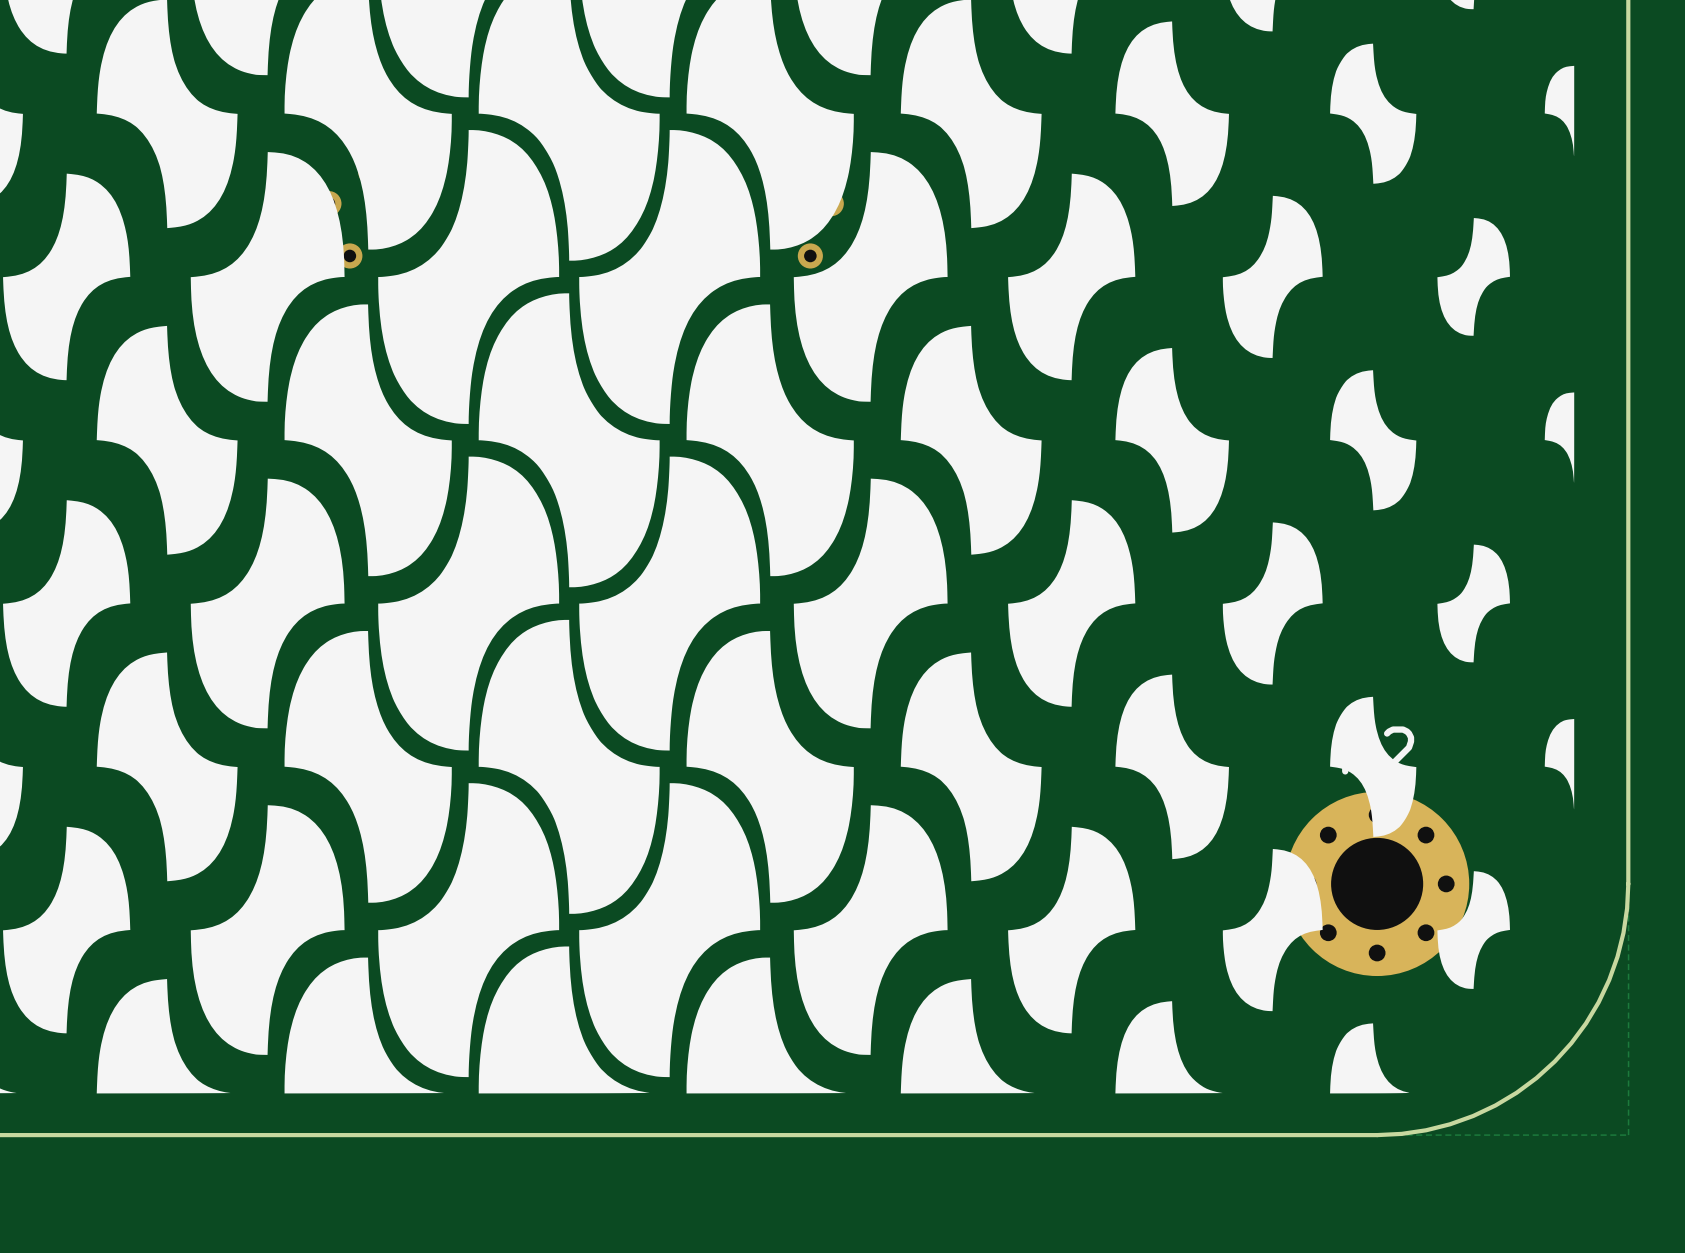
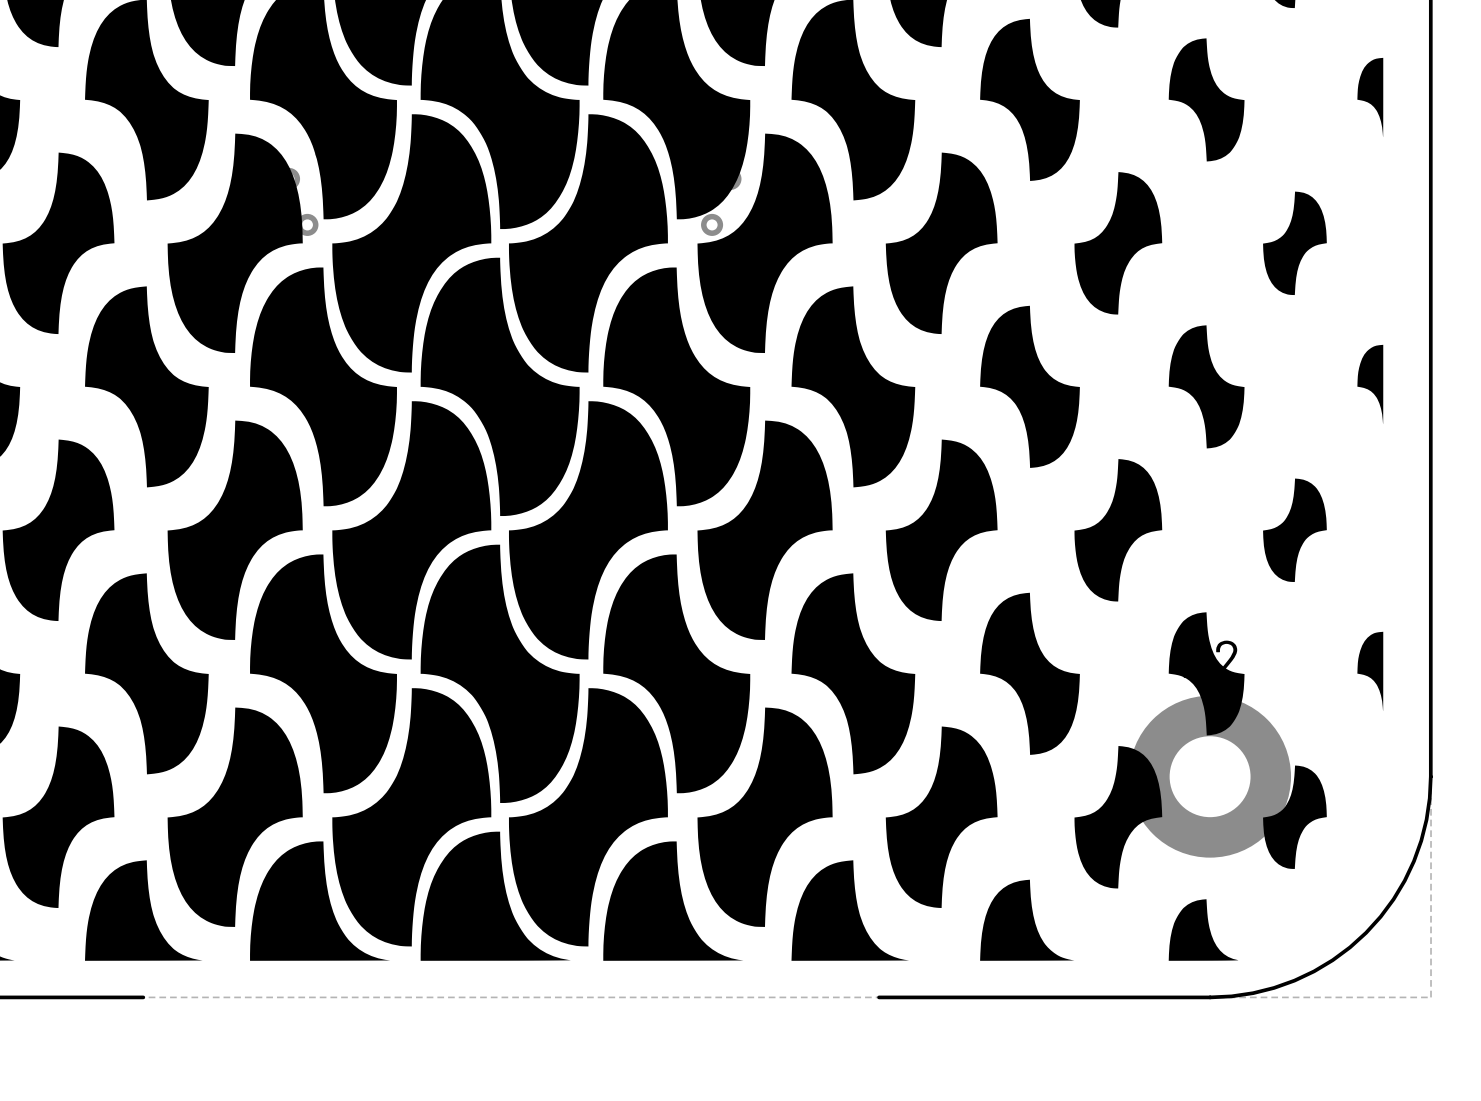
part footprint: [1285, 791, 1470, 977] -> [1129, 695, 1292, 858]
board edge: (163, 1135) (1000, 1135) -> none

